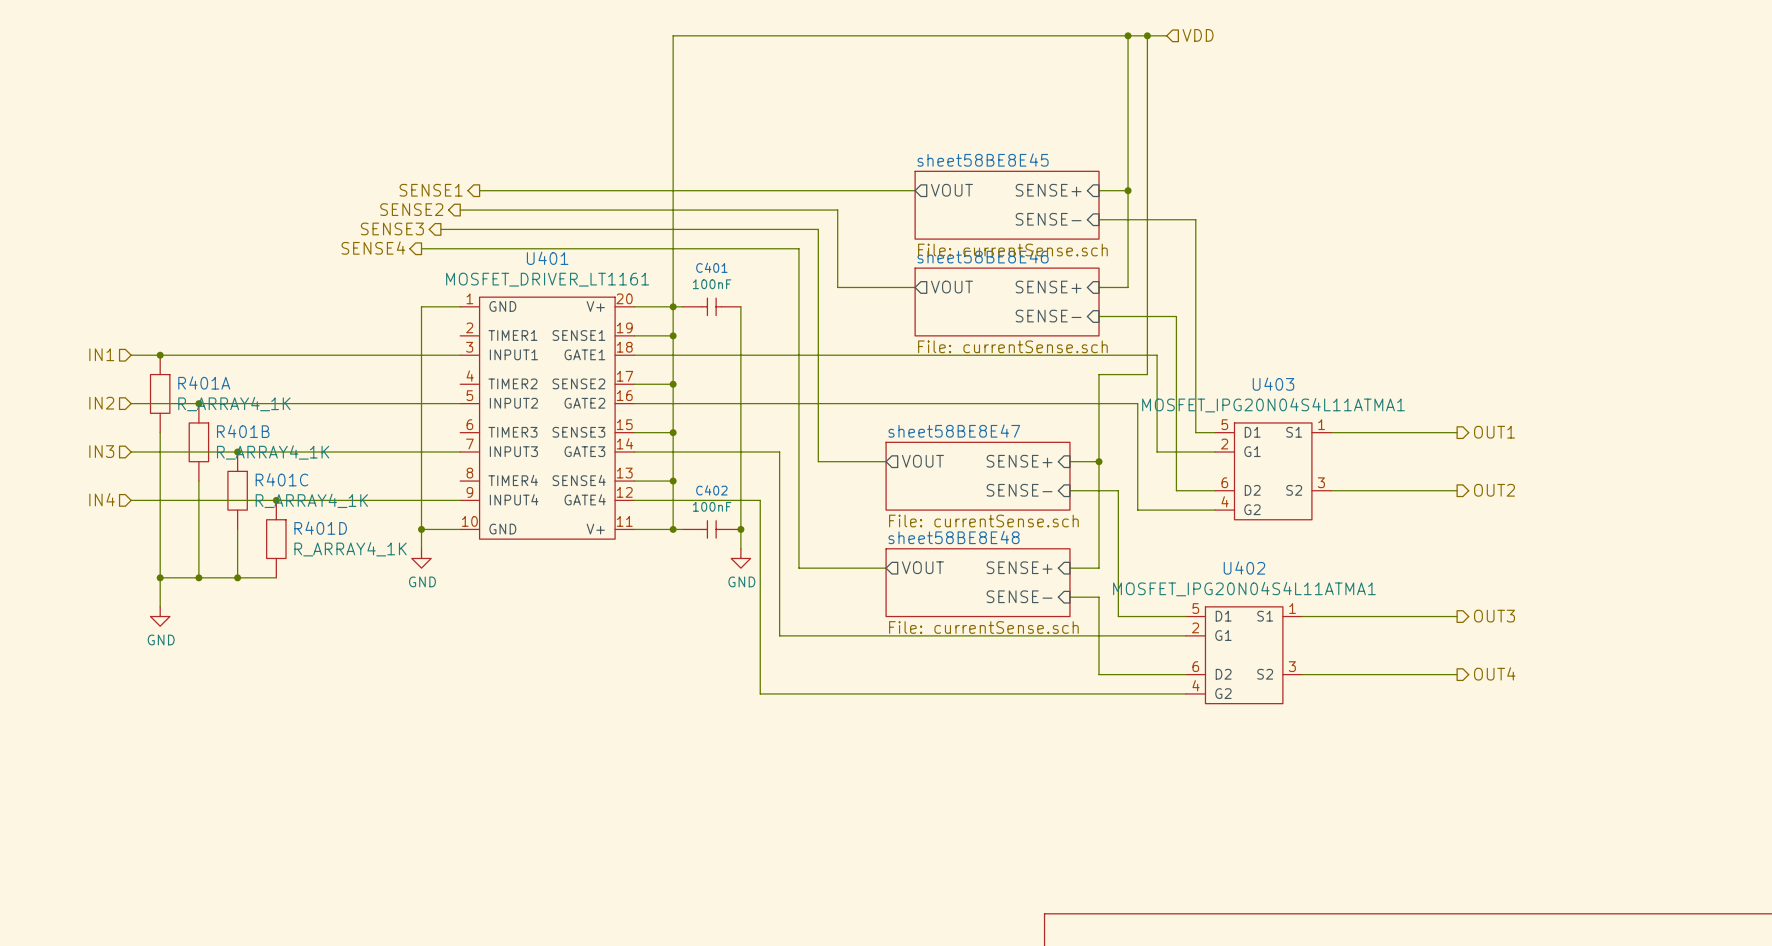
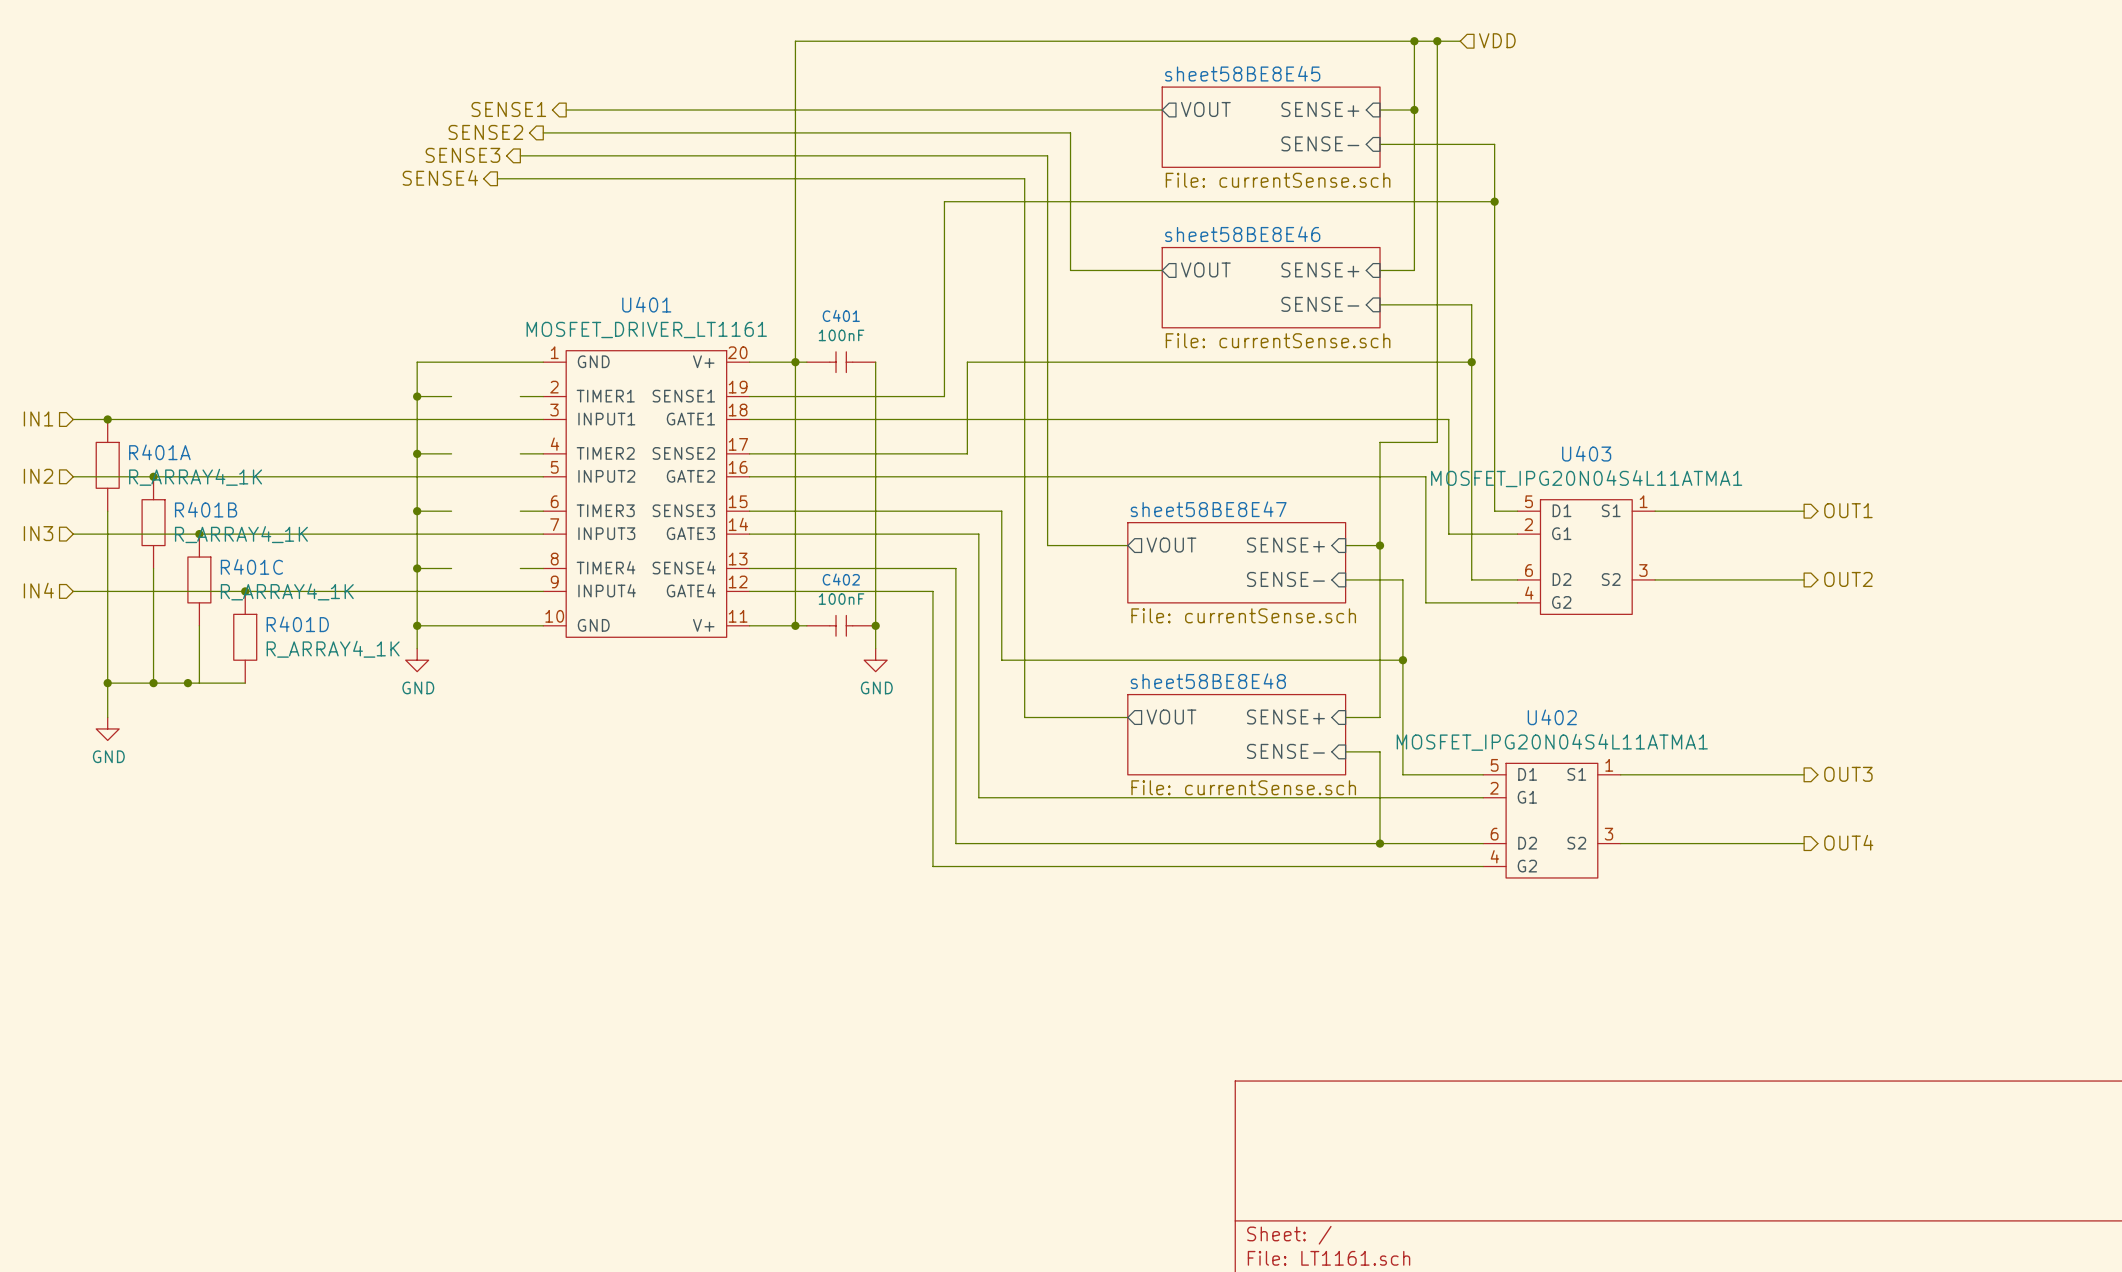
wire: (1128, 35) (1128, 287) (1099, 287) -> none
junction: (1128, 35) -> none
wire: (1147, 35) (1147, 374) (1099, 374) (1099, 568) (1069, 568) -> none
junction: (1147, 35) -> none
wire: none -> (1380, 41) (1460, 41)
junction: none -> (1414, 41)
hierarchical label position: VDD (1198, 35) -> VDD (1497, 40)
wire: none -> (1437, 41) (1437, 442) (1380, 442) (1380, 717) (1345, 717)
junction: none -> (1437, 41)
wire: none -> (566, 110) (1162, 110)
sheet pin: none -> VOUT (1205, 109)
sheet pin: none -> SENSE+ (1320, 109)
junction: none -> (1414, 110)
wire: none -> (543, 132) (1070, 132) (1070, 270) (1162, 270)
sheet pin: none -> SENSE- (1320, 143)
wire: none -> (1380, 144) (1494, 144) (1494, 511) (1517, 511)
wire: none -> (520, 155) (1047, 155) (1047, 545) (1127, 545)
wire: none -> (497, 178) (1024, 178) (1024, 717) (1127, 717)
junction: none -> (1494, 201)
hierarchical label position: SENSE1 (431, 190) -> SENSE1 (508, 109)
wire: (479, 190) (915, 190) -> none
sheet pin: VOUT (951, 190) -> none
sheet pin: SENSE+ (1048, 190) -> none
wire: (1099, 190) (1128, 190) -> (1380, 110) (1414, 110)
junction: (1128, 190) -> none
sheet sheet58BE8E45 position: (1007, 205) -> (1271, 127)
hierarchical label position: SENSE2 (411, 209) -> SENSE2 (485, 132)
wire: (460, 210) (837, 210) (837, 287) (915, 287) -> none
sheet pin: SENSE- (1048, 219) -> SENSE+ (1320, 269)
wire: (1099, 219) (1195, 219) -> (1414, 41) (1414, 259)
hierarchical label position: SENSE3 (392, 228) -> SENSE3 (462, 155)
sheet pin: none -> VOUT (1205, 269)
wire: (440, 229) (818, 229) (818, 306) -> (1471, 362) (967, 362)
wire: (1195, 229) (1195, 432) (1215, 432) -> (1414, 270) (1380, 270)
hierarchical label position: SENSE4 (373, 248) -> SENSE4 (440, 177)
wire: (421, 248) (798, 248) -> (1494, 201) (944, 201) (944, 293)
sheet pin: none -> SENSE- (1320, 304)
wire: none -> (1380, 304) (1471, 304) (1471, 579) (1517, 579)
sheet pin: VOUT (951, 287) -> none
sheet pin: SENSE+ (1048, 287) -> none
sheet sheet58BE8E46 position: (1007, 301) -> (1271, 287)
wire: (421, 306) (421, 548) -> (497, 362) (417, 362) (417, 648)
junction: none -> (1471, 362)
sheet pin: SENSE- (1048, 316) -> none
wire: (1099, 316) (1176, 316) (1176, 490) -> (1345, 579) (1391, 579)
wire: none -> (417, 396) (451, 396)
junction: none -> (417, 396)
wire: none -> (520, 396) (543, 396)
junction: (673, 335) -> none
wire: (798, 335) (798, 568) (886, 568) -> (944, 396) (795, 396)
hierarchical label position: IN1 (101, 354) -> IN1 (38, 418)
wire: none -> (73, 419) (153, 419)
junction: none -> (107, 419)
junction: (160, 355) -> none
wire: (1157, 355) (1157, 452) (1215, 452) -> (1368, 419) (1448, 419) (1448, 534) (1517, 534)
wire: none -> (417, 453) (451, 453)
junction: none -> (417, 453)
wire: none -> (520, 453) (543, 453)
junction: (673, 384) -> none
wire: (818, 384) (818, 461) (886, 461) -> (967, 453) (795, 453)
R401A position: (160, 393) -> (107, 465)
wire: none -> (73, 476) (153, 476)
hierarchical label position: IN2 (101, 403) -> IN2 (38, 476)
junction: none -> (153, 476)
junction: (198, 403) -> none
wire: (1137, 403) (1137, 510) (1205, 510) -> (1345, 476) (1425, 476) (1425, 602)
wire: (160, 432) (160, 606) -> (107, 511) (107, 717)
wire: none -> (417, 511) (451, 511)
junction: none -> (417, 511)
wire: none -> (520, 511) (543, 511)
wire: none -> (795, 511) (1001, 511) (1001, 660) (1402, 660)
junction: (673, 432) -> none
wire: (1331, 432) (1399, 432) -> (1723, 511) (1804, 511)
hierarchical label position: OUT1 (1494, 432) -> OUT1 (1848, 510)
R401B position: (198, 442) -> (153, 522)
hierarchical label position: IN3 (101, 451) -> IN3 (38, 533)
wire: none -> (73, 534) (153, 534)
junction: none -> (199, 534)
junction: (237, 452) -> none
wire: (779, 452) (779, 635) (1137, 635) -> (921, 534) (978, 534) (978, 797) (1299, 797)
sheet pin: VOUT (922, 461) -> none
sheet pin: none -> VOUT (1171, 545)
sheet pin position: SENSE+ (1019, 461) -> SENSE+ (1285, 545)
wire: (1069, 461) (1099, 461) -> (1345, 545) (1380, 545)
junction: (1099, 461) -> none
junction: none -> (1380, 545)
U403 position: (1273, 471) -> (1586, 557)
sheet sheet58BE8E47 position: (978, 476) -> (1236, 562)
wire: (198, 481) (198, 577) -> (153, 568) (153, 683)
wire: none -> (417, 568) (451, 568)
junction: none -> (417, 568)
wire: none -> (520, 568) (543, 568)
wire: none -> (795, 568) (955, 568) (955, 843) (1483, 843)
junction: (673, 481) -> none
R401C position: (237, 490) -> (199, 579)
sheet pin position: SENSE- (1019, 490) -> SENSE- (1285, 579)
wire: (1069, 490) (1118, 490) (1118, 616) (1186, 616) -> none
wire: (1186, 490) (1215, 490) -> (1402, 579) (1402, 774) (1483, 774)
wire: (1331, 490) (1399, 490) -> (1723, 579) (1804, 579)
hierarchical label position: OUT2 (1494, 490) -> OUT2 (1848, 579)
hierarchical label position: IN4 (102, 499) -> IN4 (38, 590)
wire: none -> (73, 591) (153, 591)
junction: none -> (245, 591)
junction: (276, 500) -> none
wire: (760, 500) (760, 693) (1186, 693) -> (898, 591) (932, 591) (932, 866) (1483, 866)
wire: none -> (1437, 602) (1517, 602)
wire: (237, 529) (237, 577) -> (199, 625) (199, 683)
wire: none -> (417, 625) (497, 625)
junction: none -> (417, 625)
junction: (421, 529) -> none
R401D position: (276, 539) -> (245, 637)
power symbol position: GND (421, 558) -> GND (417, 660)
junction: none -> (1402, 660)
sheet pin: VOUT (922, 567) -> none
sheet pin: SENSE+ (1019, 567) -> none
junction: none -> (107, 683)
junction: none -> (153, 683)
junction: (198, 577) -> none
wire: (208, 577) (276, 577) -> (107, 683) (187, 683)
junction: (237, 577) -> none
sheet sheet58BE8E48 position: (978, 582) -> (1236, 734)
sheet pin: SENSE- (1019, 596) -> SENSE+ (1285, 716)
wire: (1069, 597) (1099, 597) (1099, 674) -> none
sheet pin: none -> VOUT (1171, 716)
power symbol position: GND (160, 616) -> GND (107, 728)
wire: (1302, 616) (1457, 616) -> (1620, 774) (1804, 774)
hierarchical label position: OUT3 (1494, 616) -> OUT3 (1848, 774)
sheet pin: none -> SENSE- (1285, 751)
wire: (1166, 635) (1186, 635) -> (1380, 751) (1380, 843)
U402 position: (1244, 655) -> (1551, 820)
hierarchical label position: OUT4 (1494, 673) -> OUT4 (1848, 842)
wire: none -> (1402, 797) (1483, 797)
wire: (1302, 674) (1457, 674) -> (1620, 843) (1804, 843)
junction: none -> (1380, 843)

